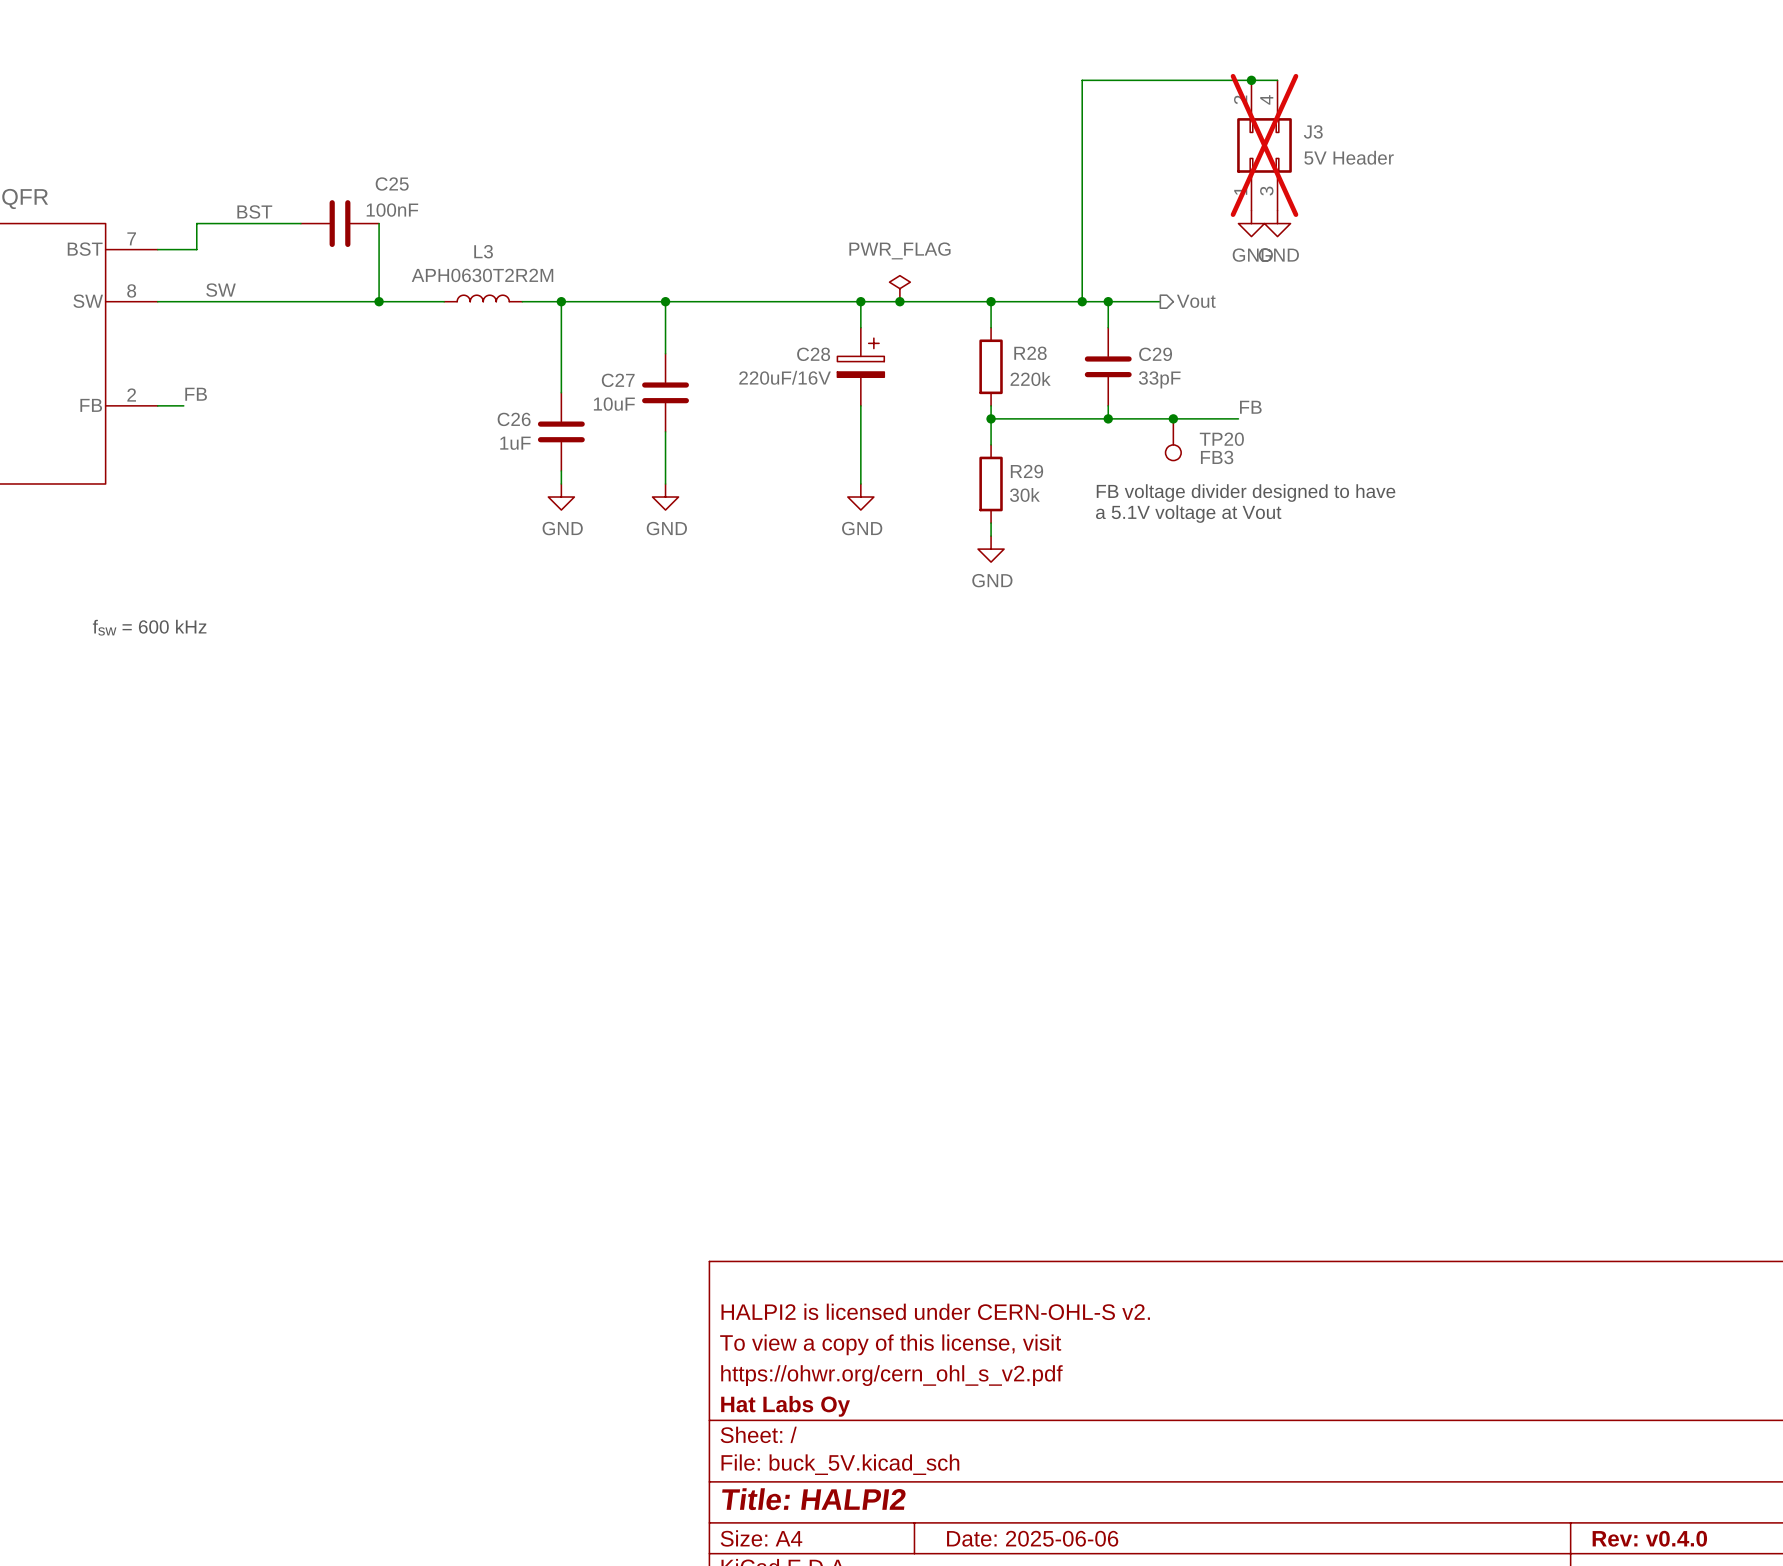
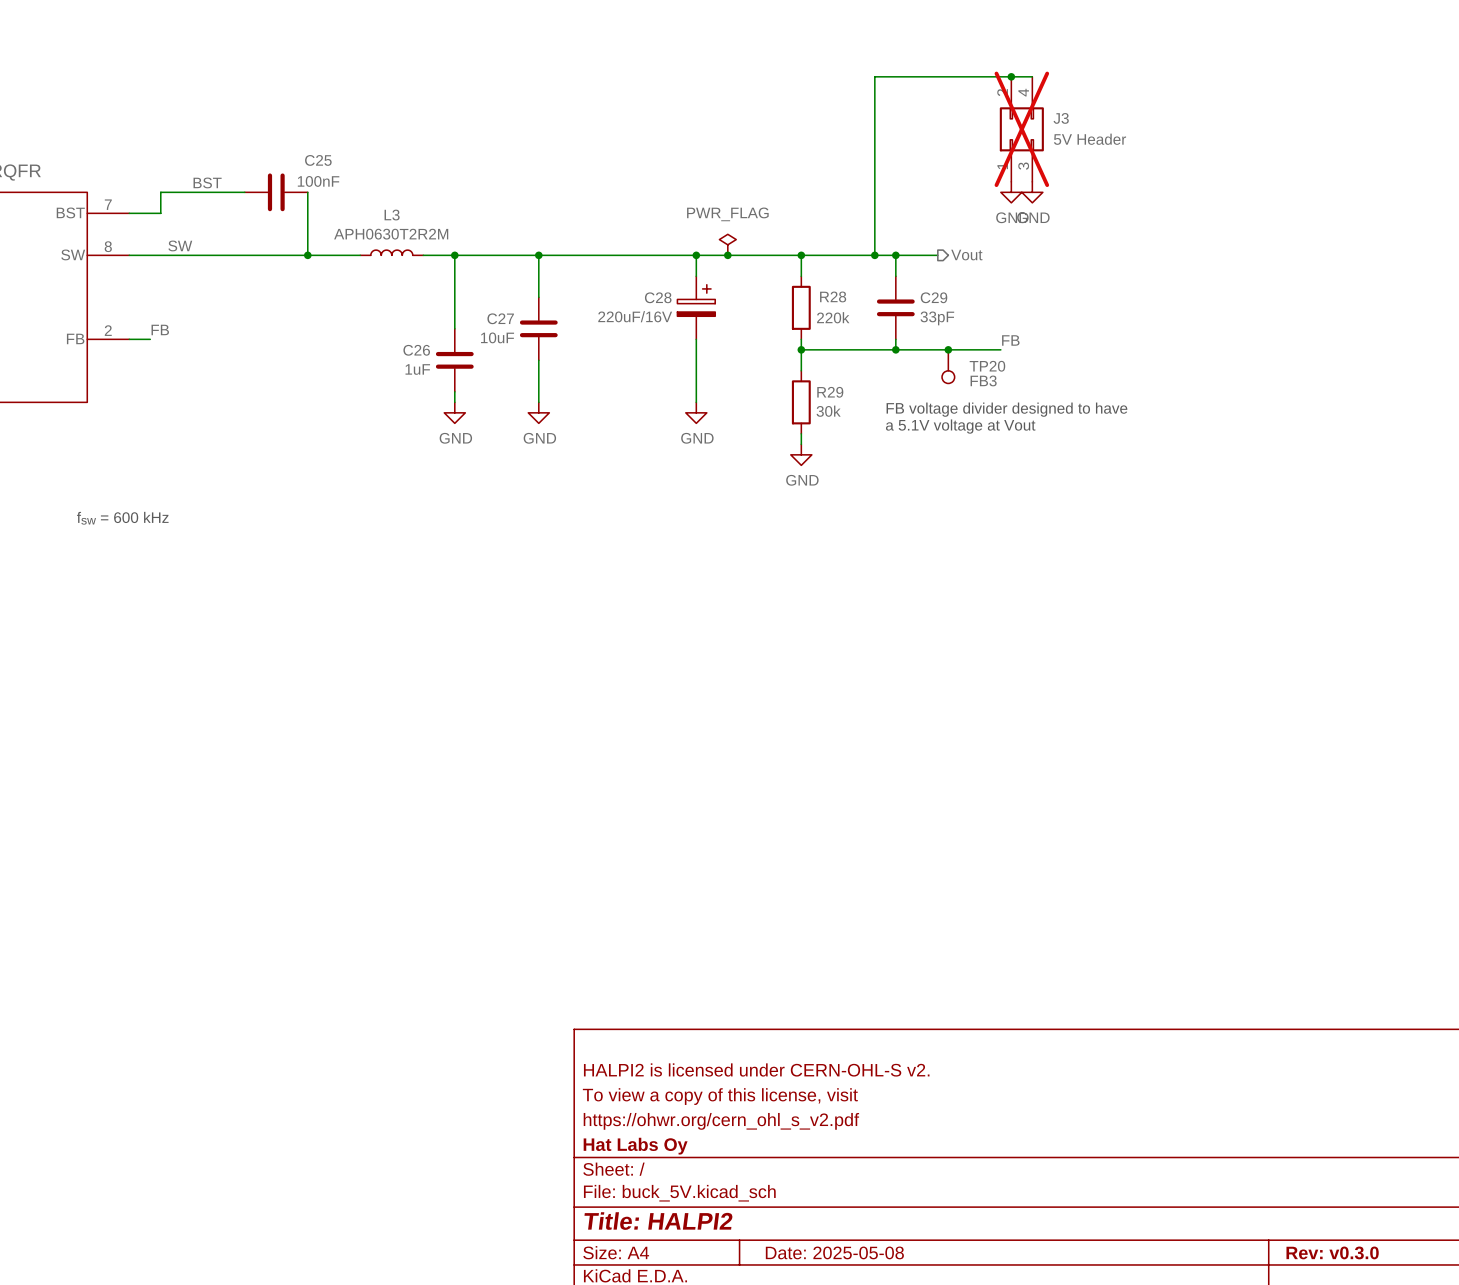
title block: Date: 2025-06-06 (1032, 1538) -> Date: 2025-05-08 (834, 1252)
title block: Rev: v0.4.0 (1649, 1538) -> Rev: v0.3.0 (1332, 1252)

